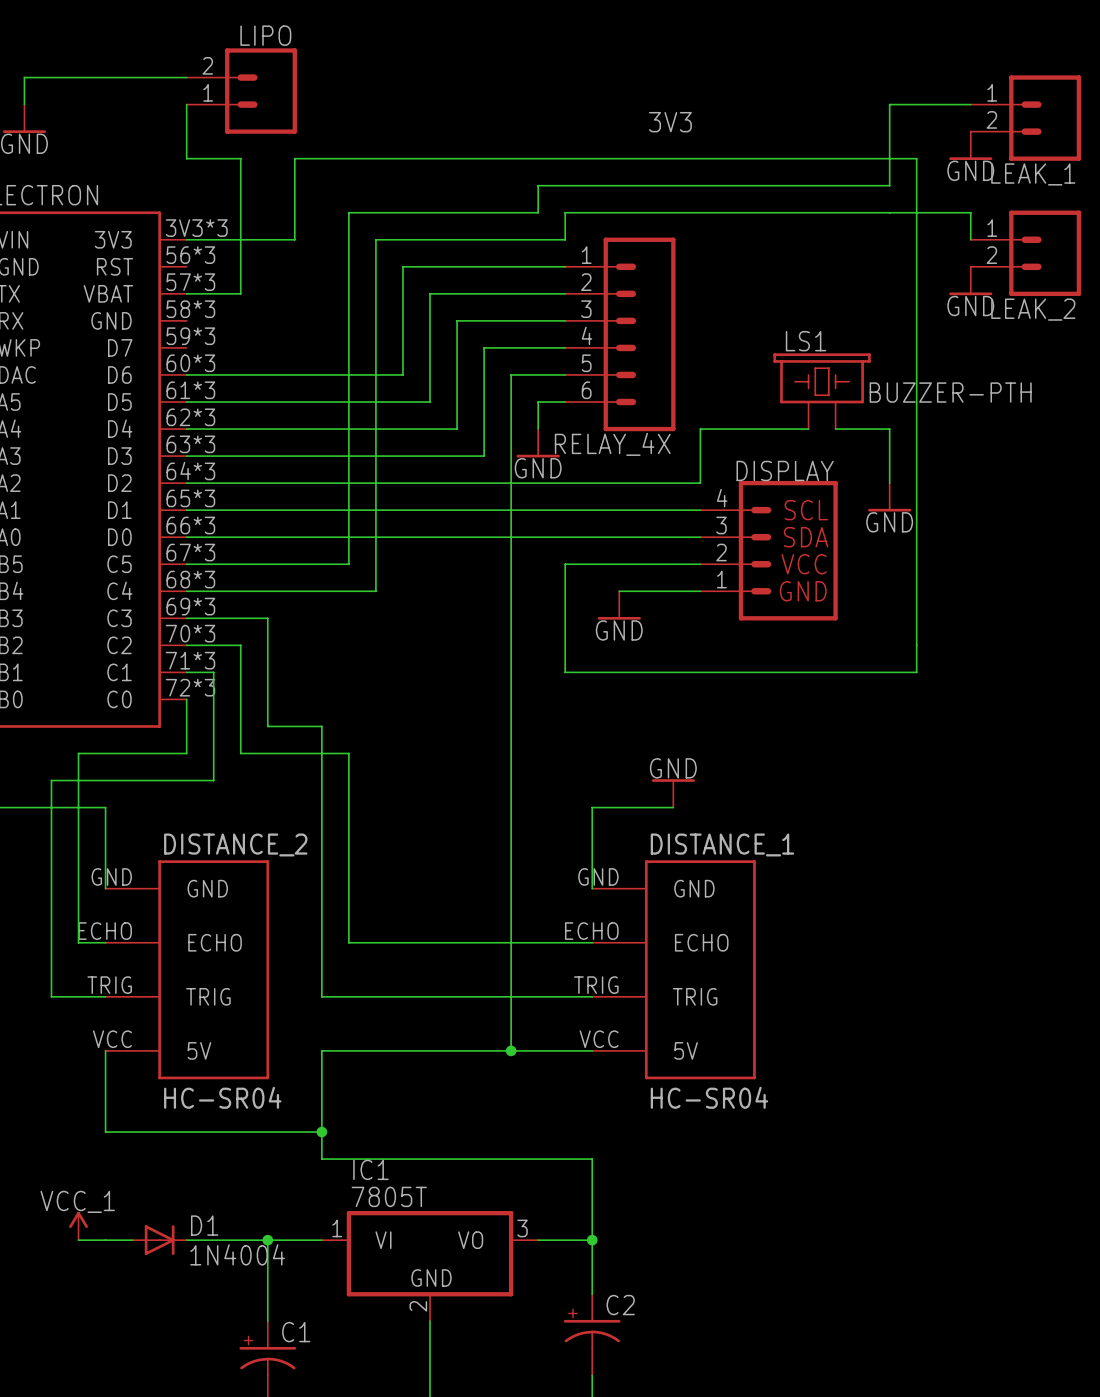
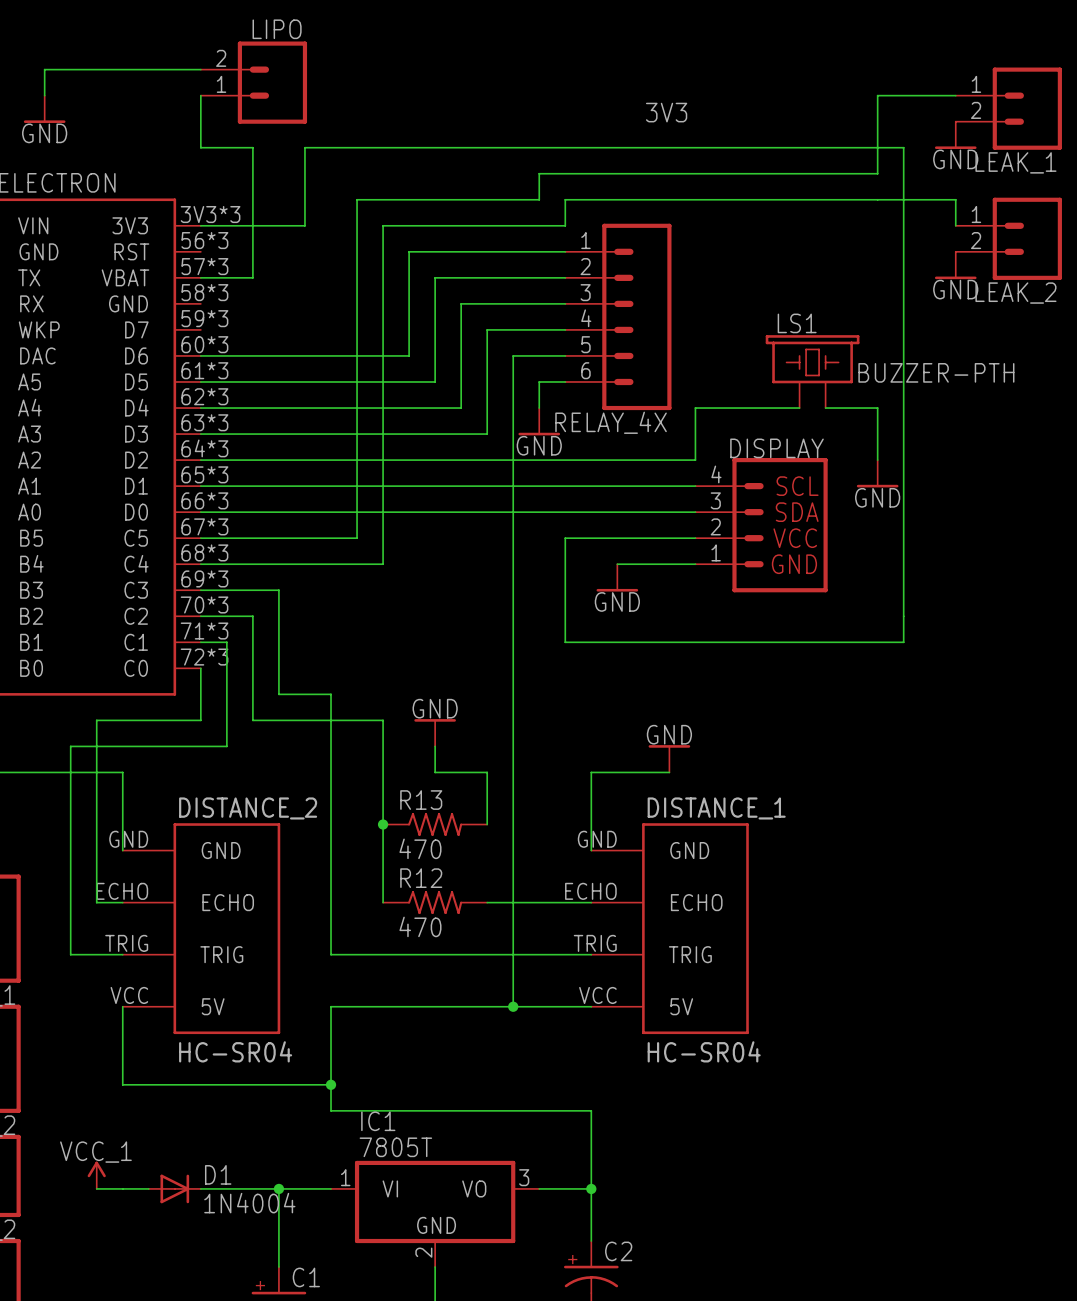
wire: (348, 753) (348, 942) (484, 942) -> (357, 720) (383, 720) (383, 902)
power symbol: none -> GND (435, 732)
wire: none -> (435, 746) (435, 772) (487, 772) (487, 824)
junction: none -> (383, 824)
R13: none -> 470 (435, 824)
R12: none -> 470 (435, 902)

